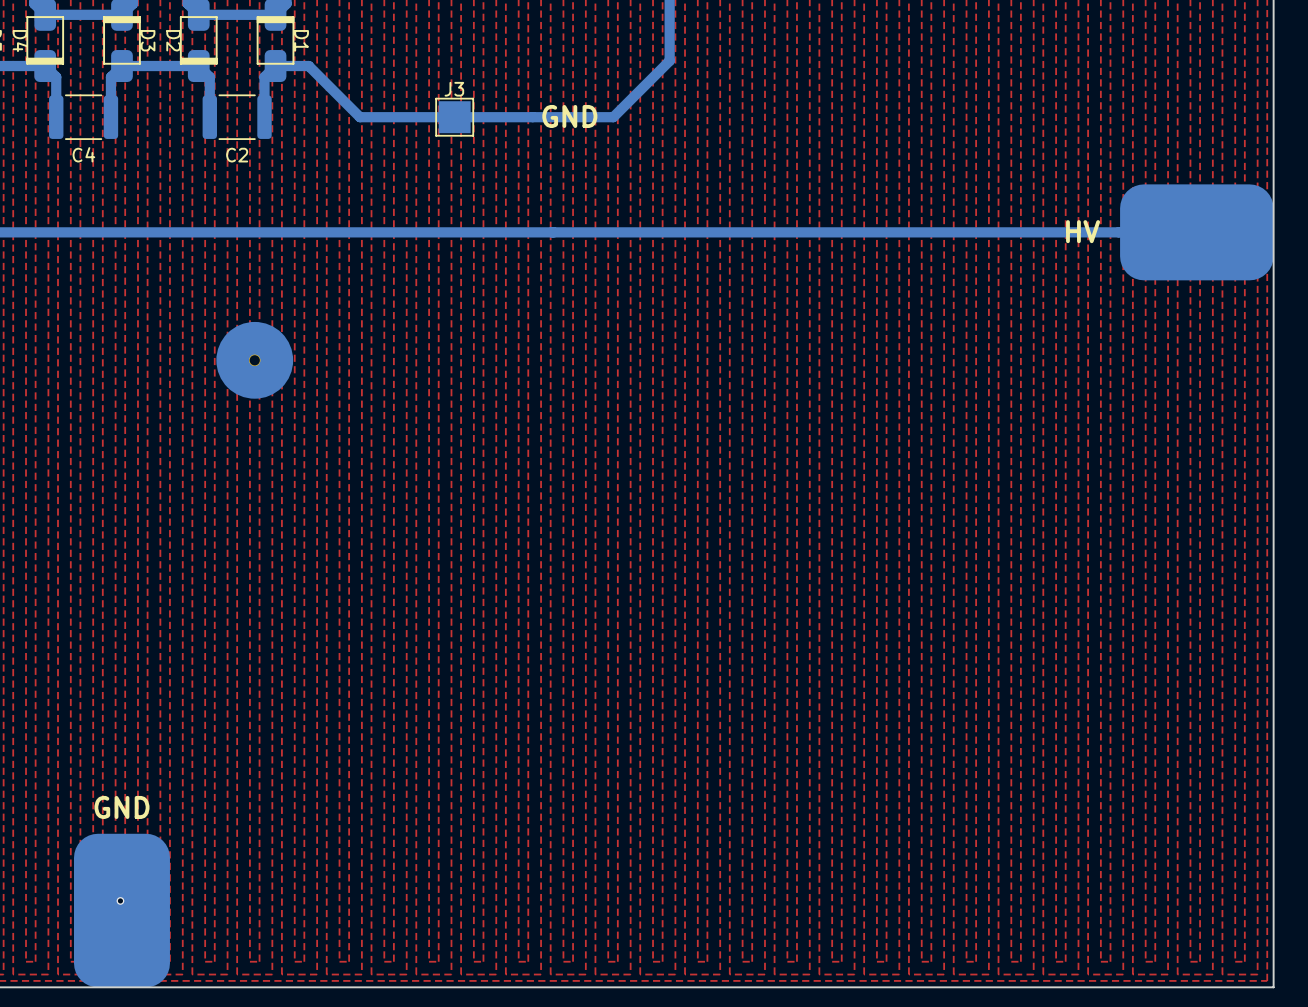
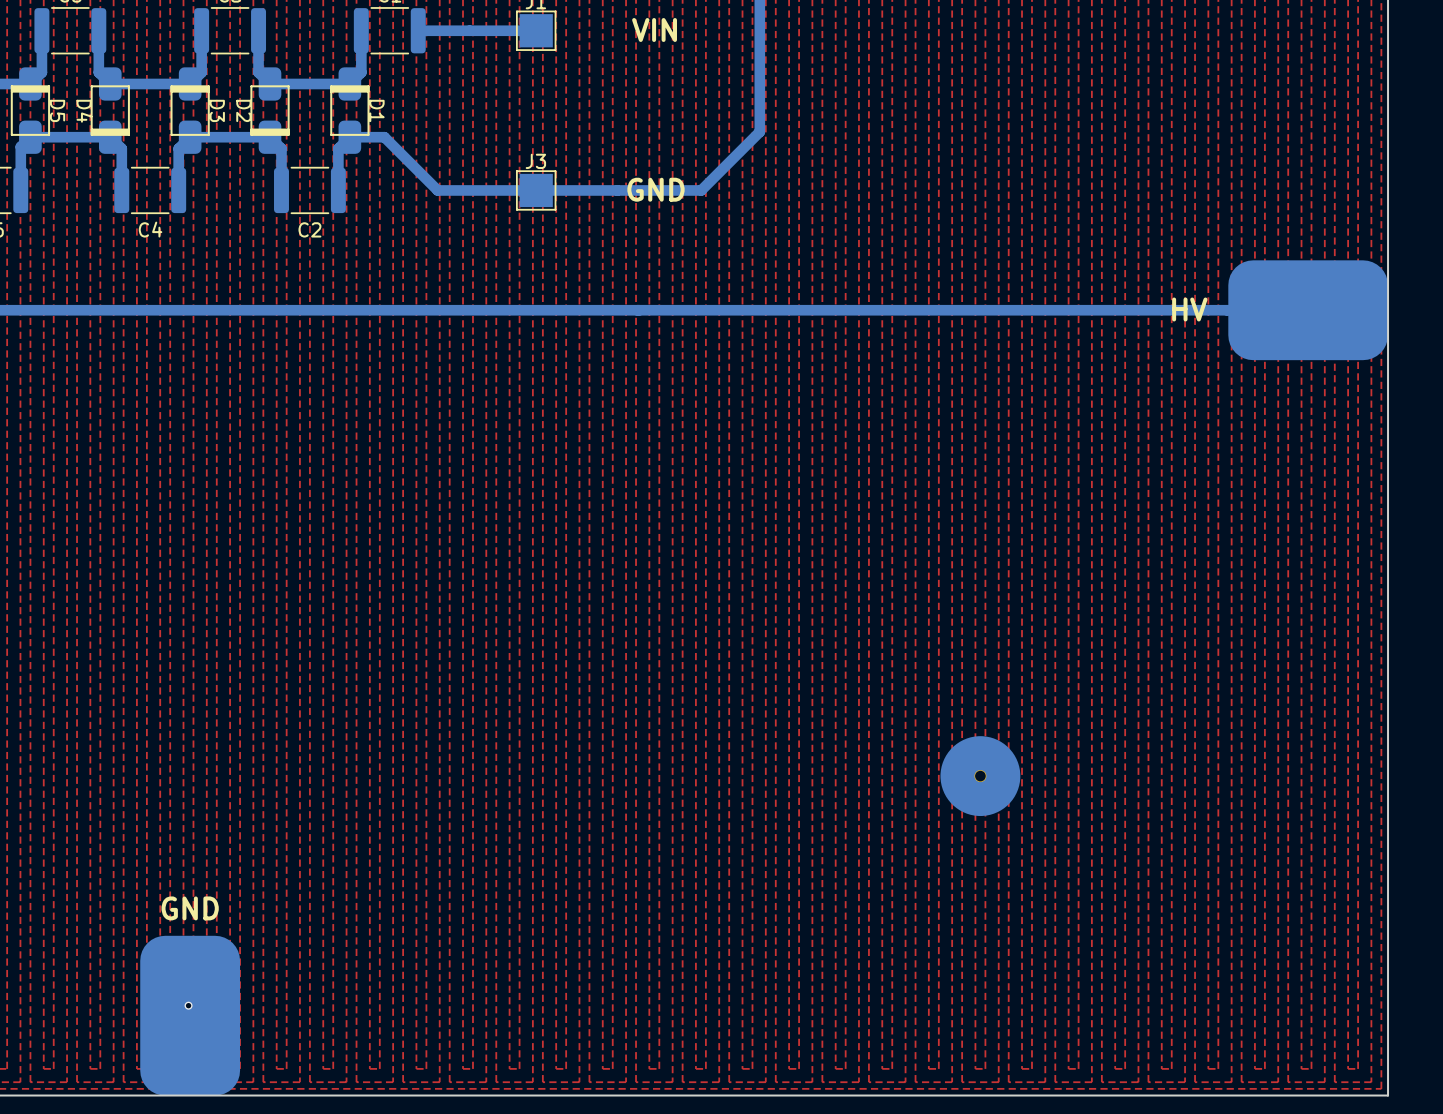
part: (254, 360) -> none
part: none -> (980, 776)

